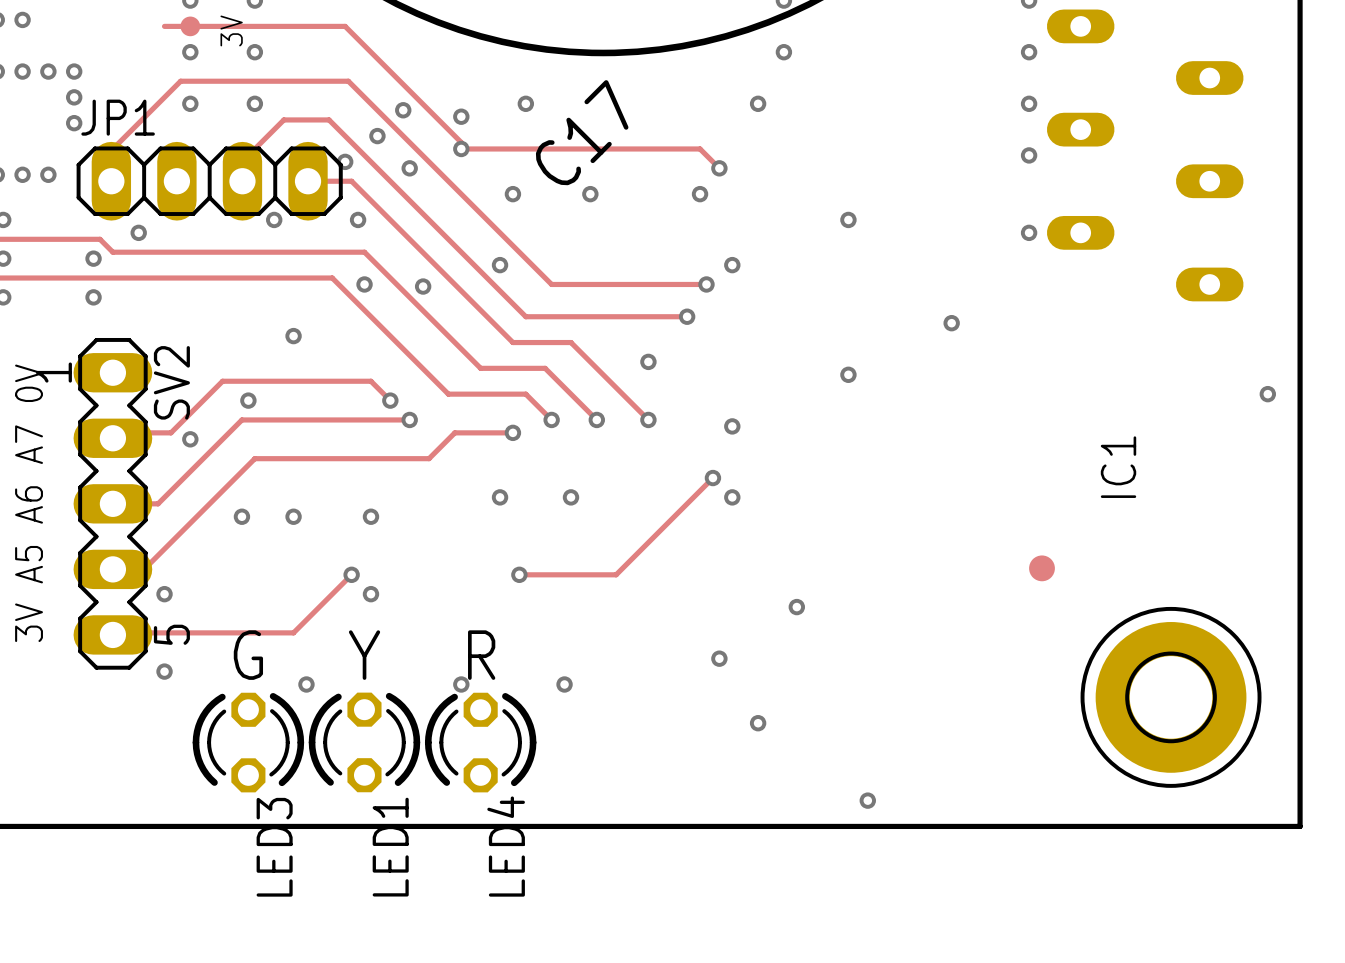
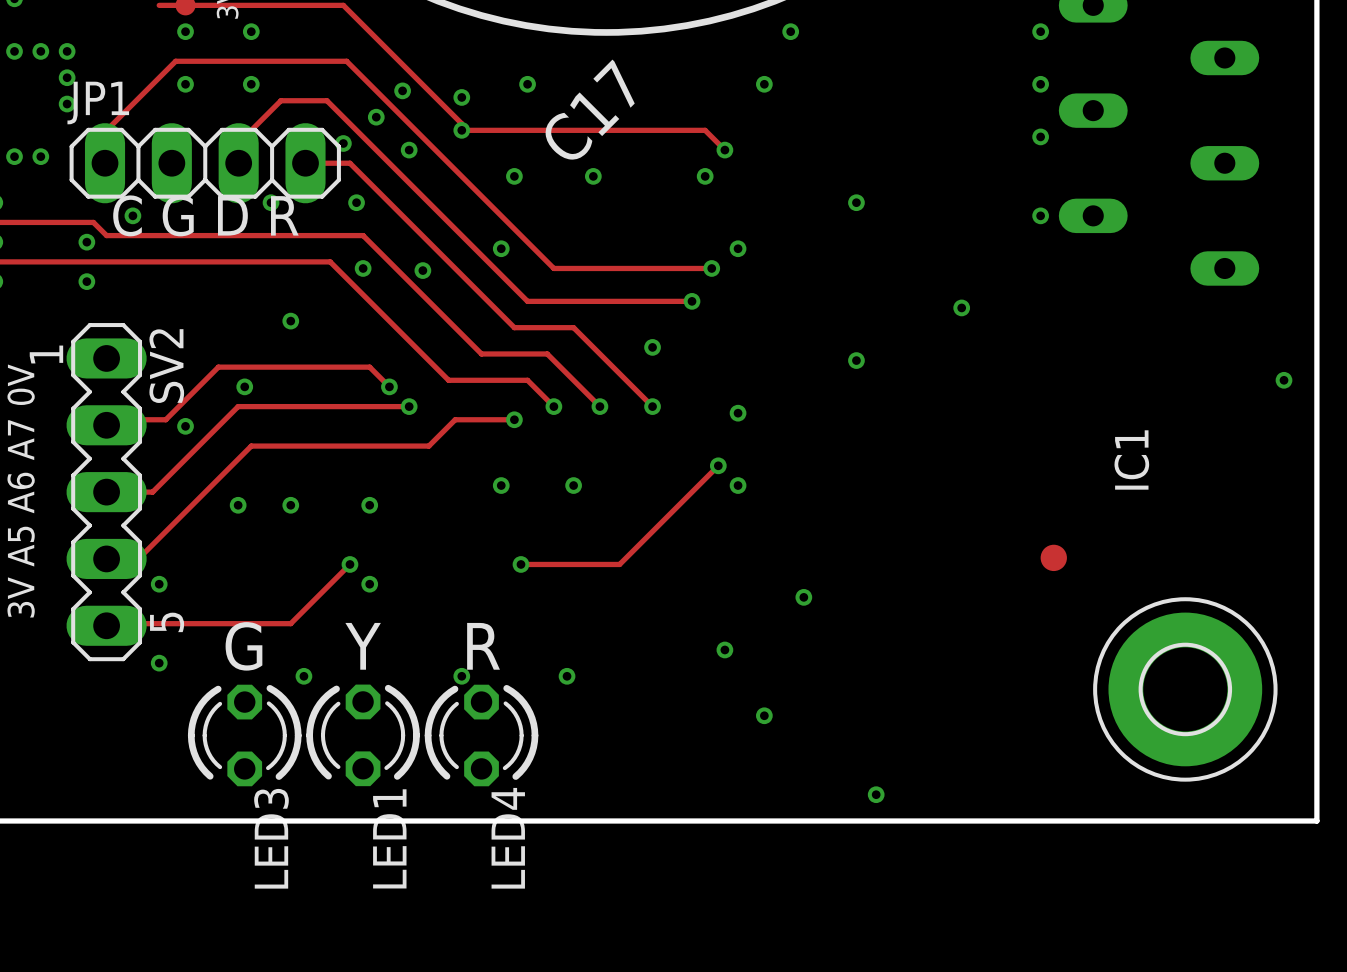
text: none -> C G D R (205, 215)

